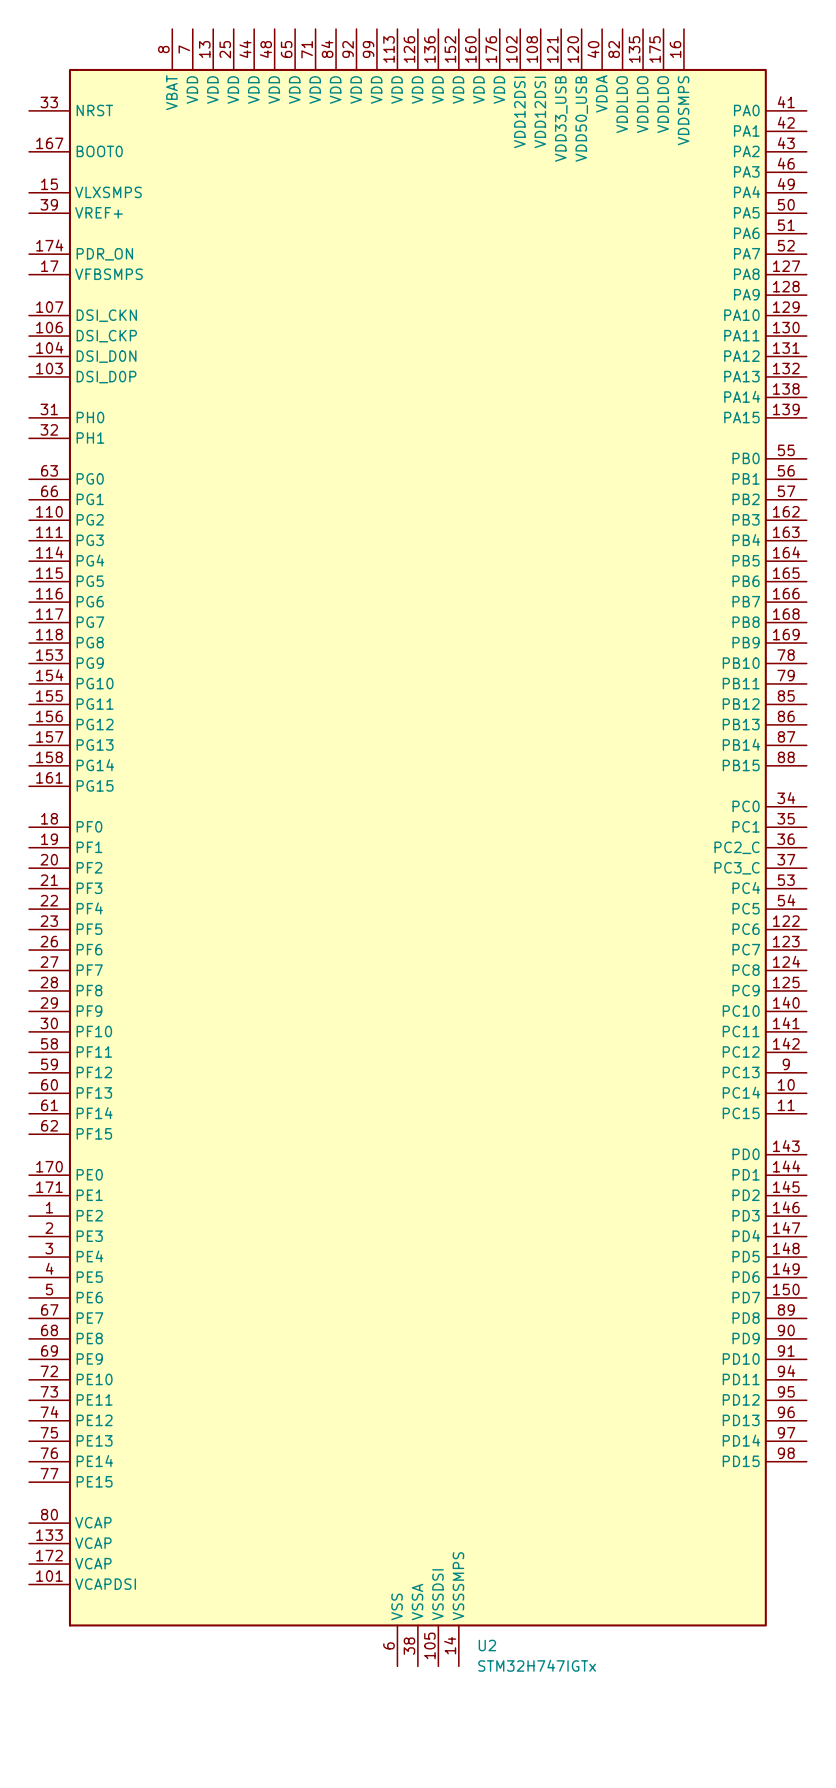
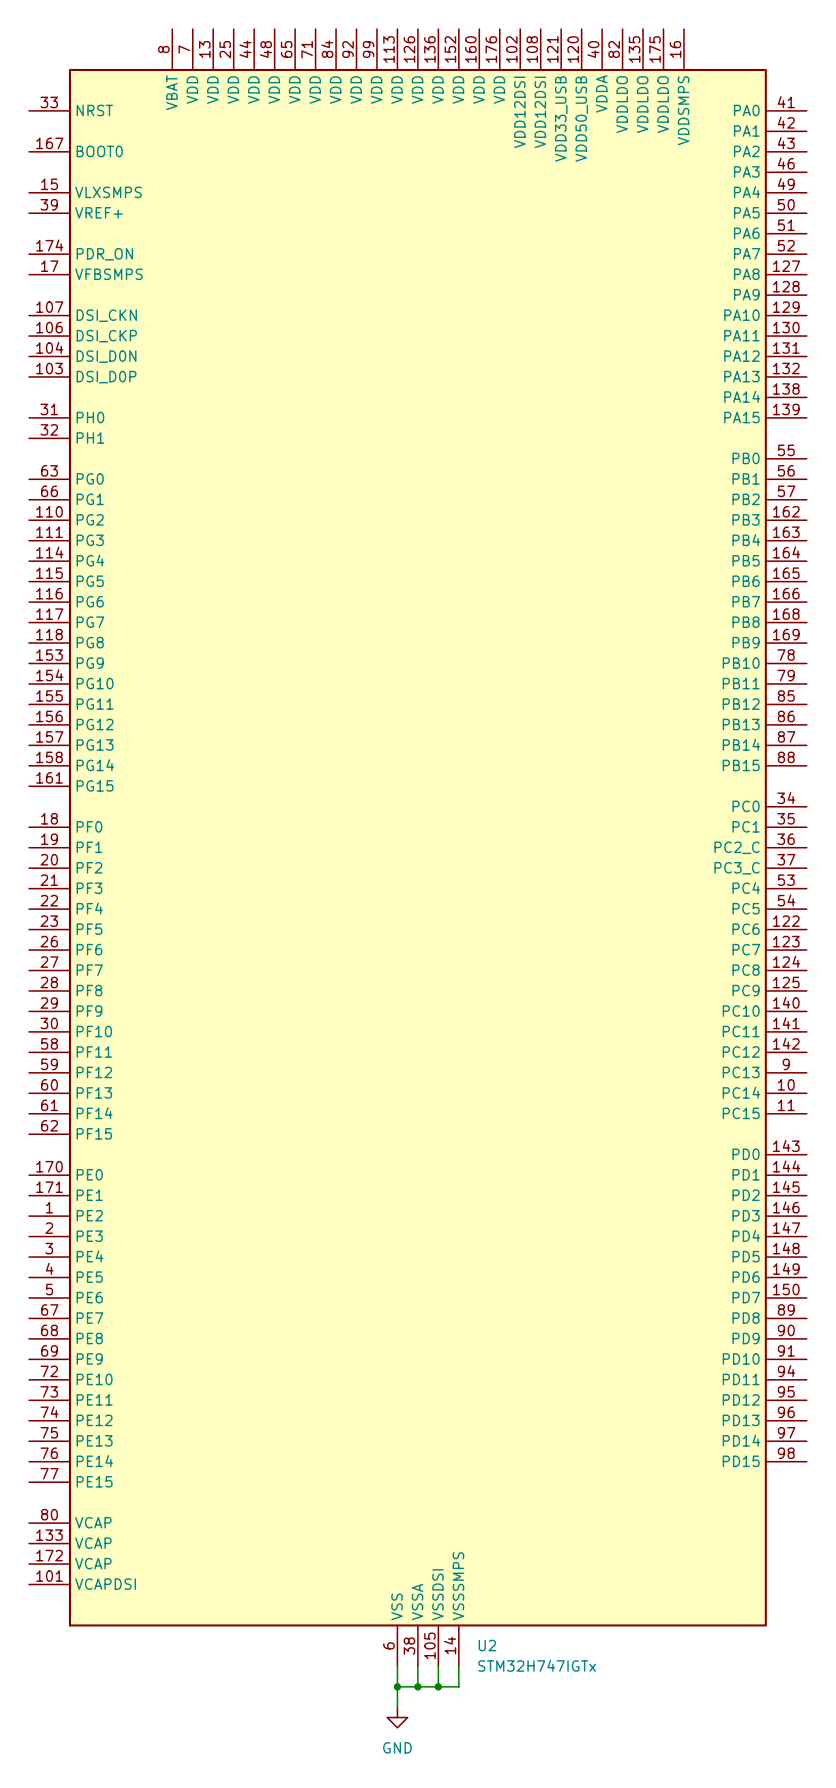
wire: none -> (397, 1666) (397, 1707)
wire: none -> (417, 1666) (417, 1686)
wire: none -> (438, 1666) (438, 1686)
wire: none -> (458, 1666) (458, 1686) (397, 1686)
junction: none -> (397, 1686)
junction: none -> (417, 1686)
junction: none -> (438, 1686)
power symbol: none -> GND (397, 1717)

